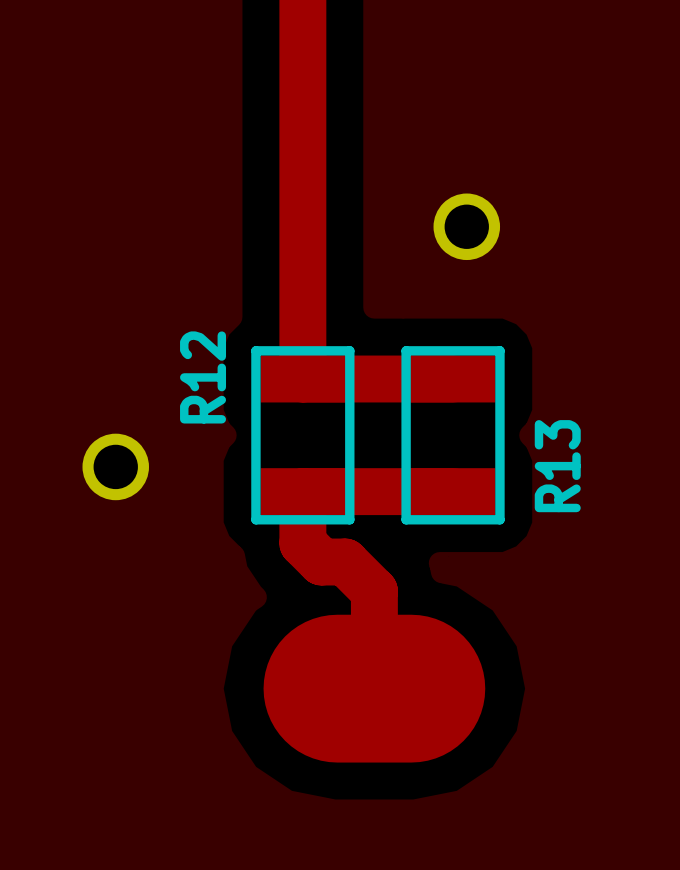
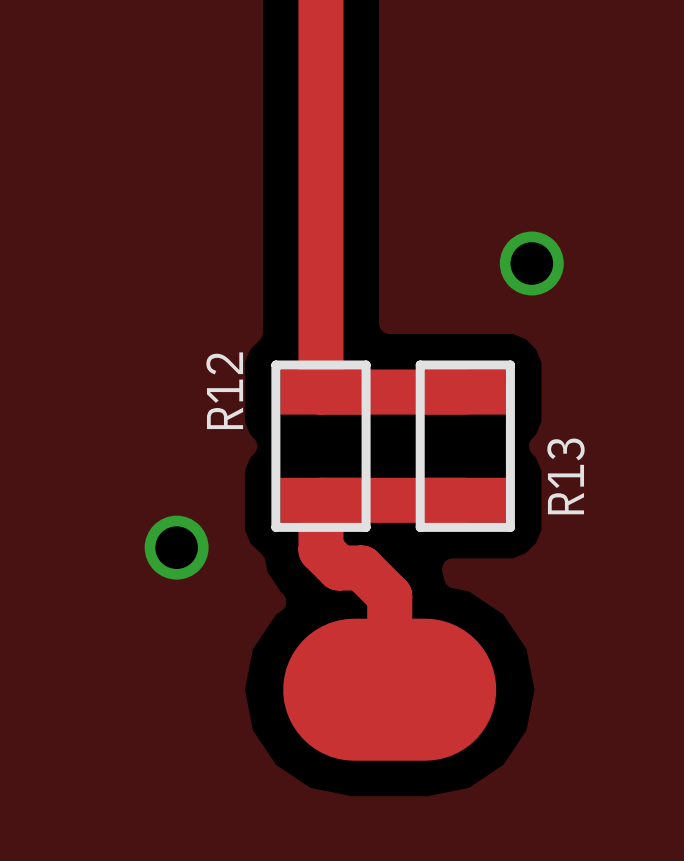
part position: (466, 226) -> (531, 263)
part position: (115, 466) -> (176, 547)

